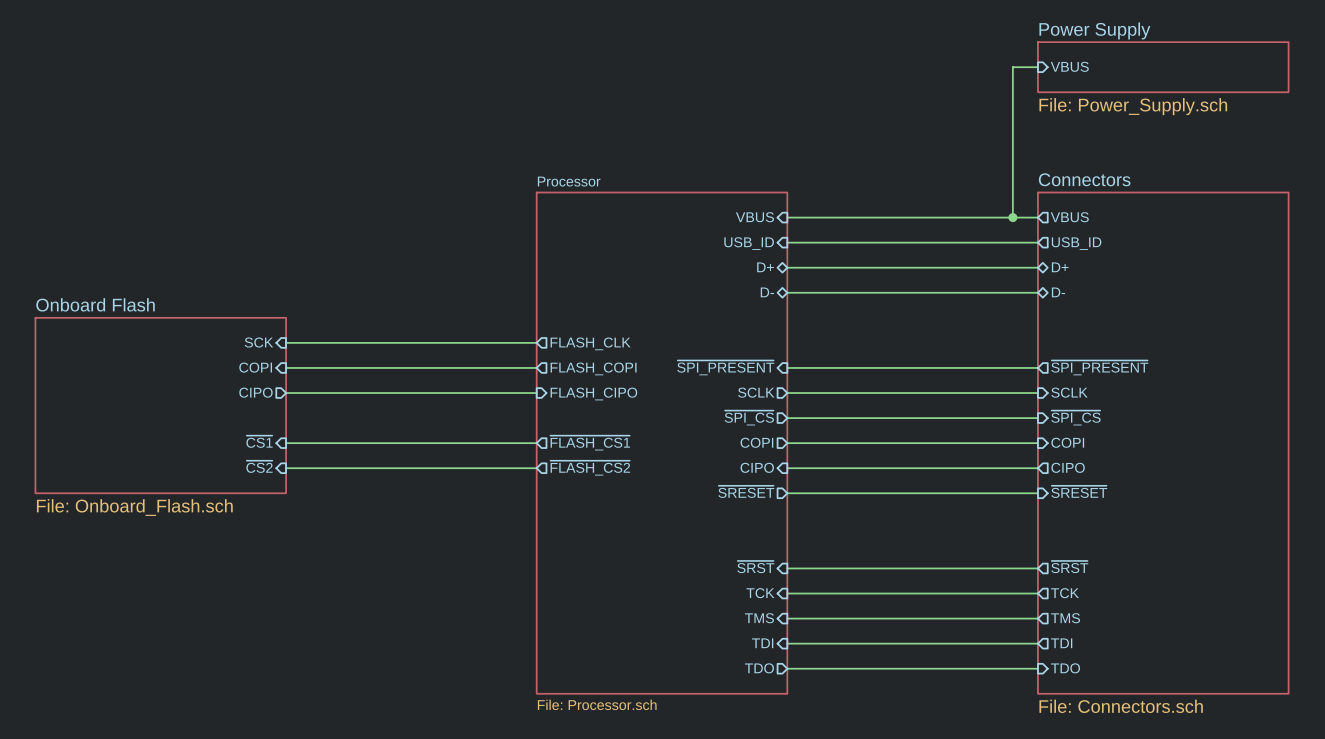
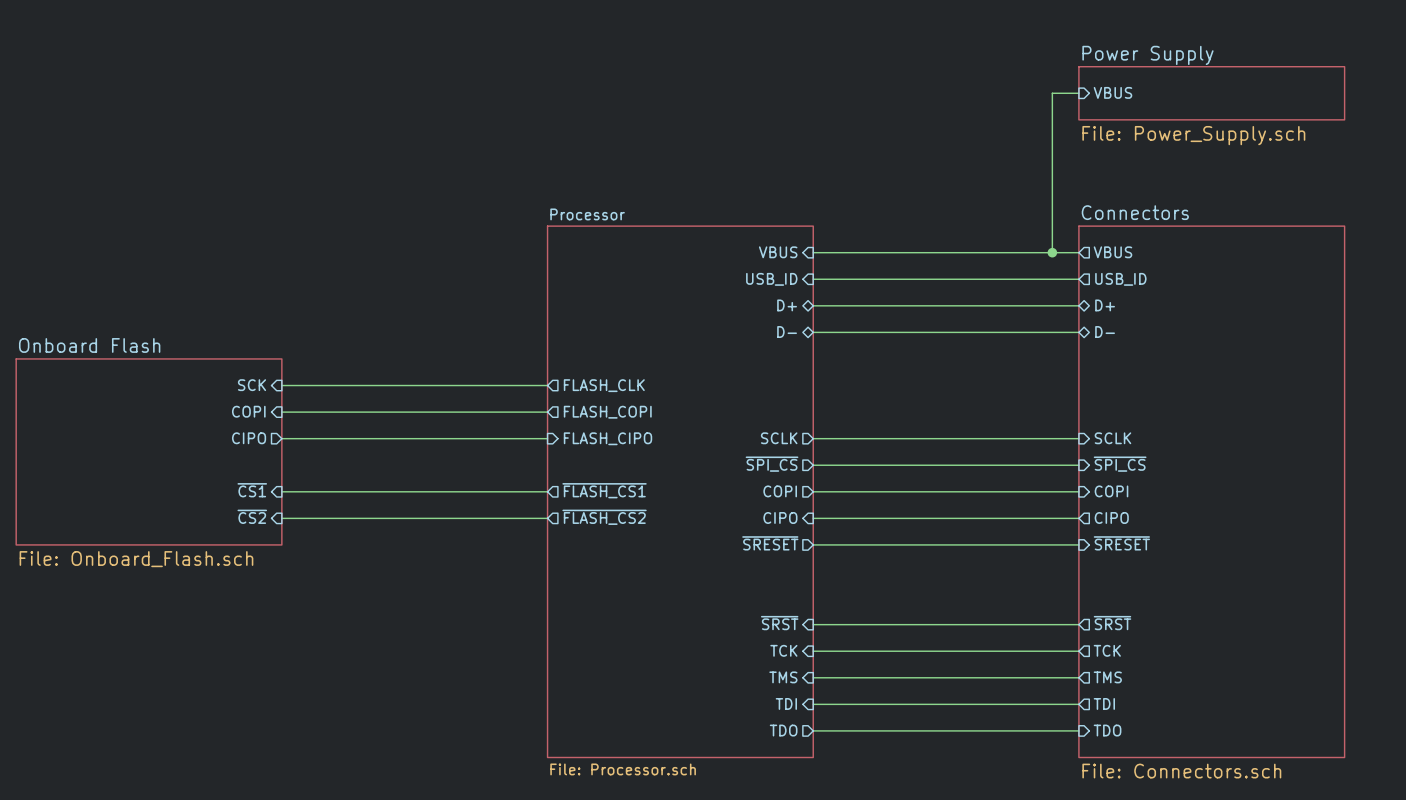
sheet pin: ~{SPI_PRESENT} (725, 367) -> none
wire: (787, 367) (1037, 367) -> none
sheet pin: ~{SPI_PRESENT} (1099, 367) -> none

